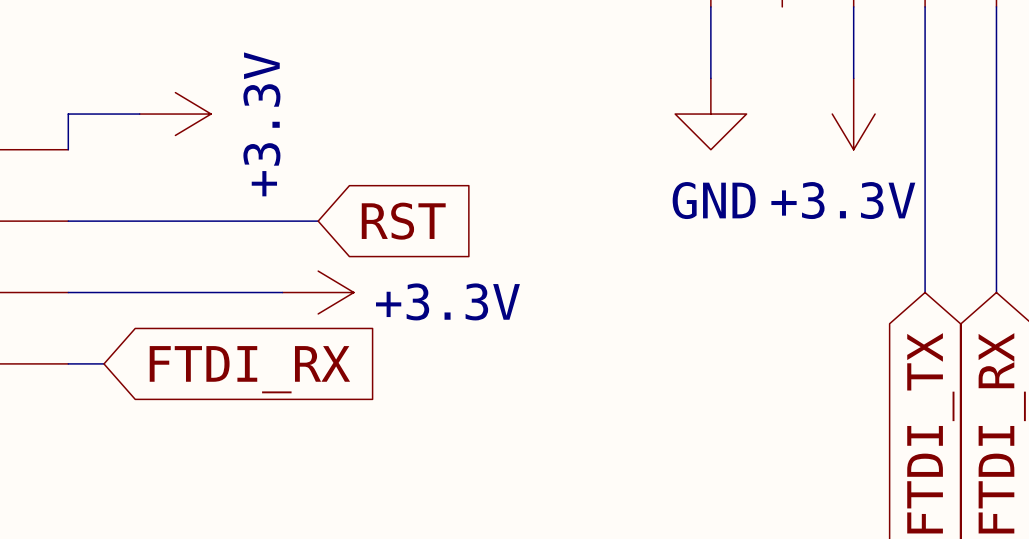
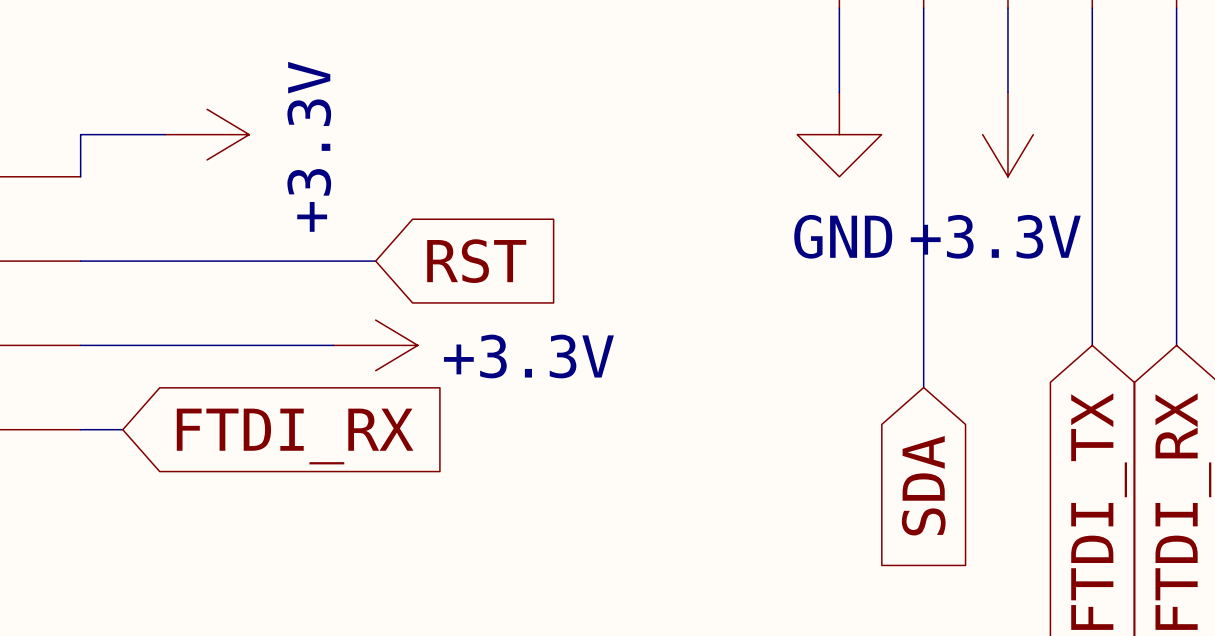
wire: none -> (923, 8) (923, 387)
global label: none -> SDA (923, 485)

